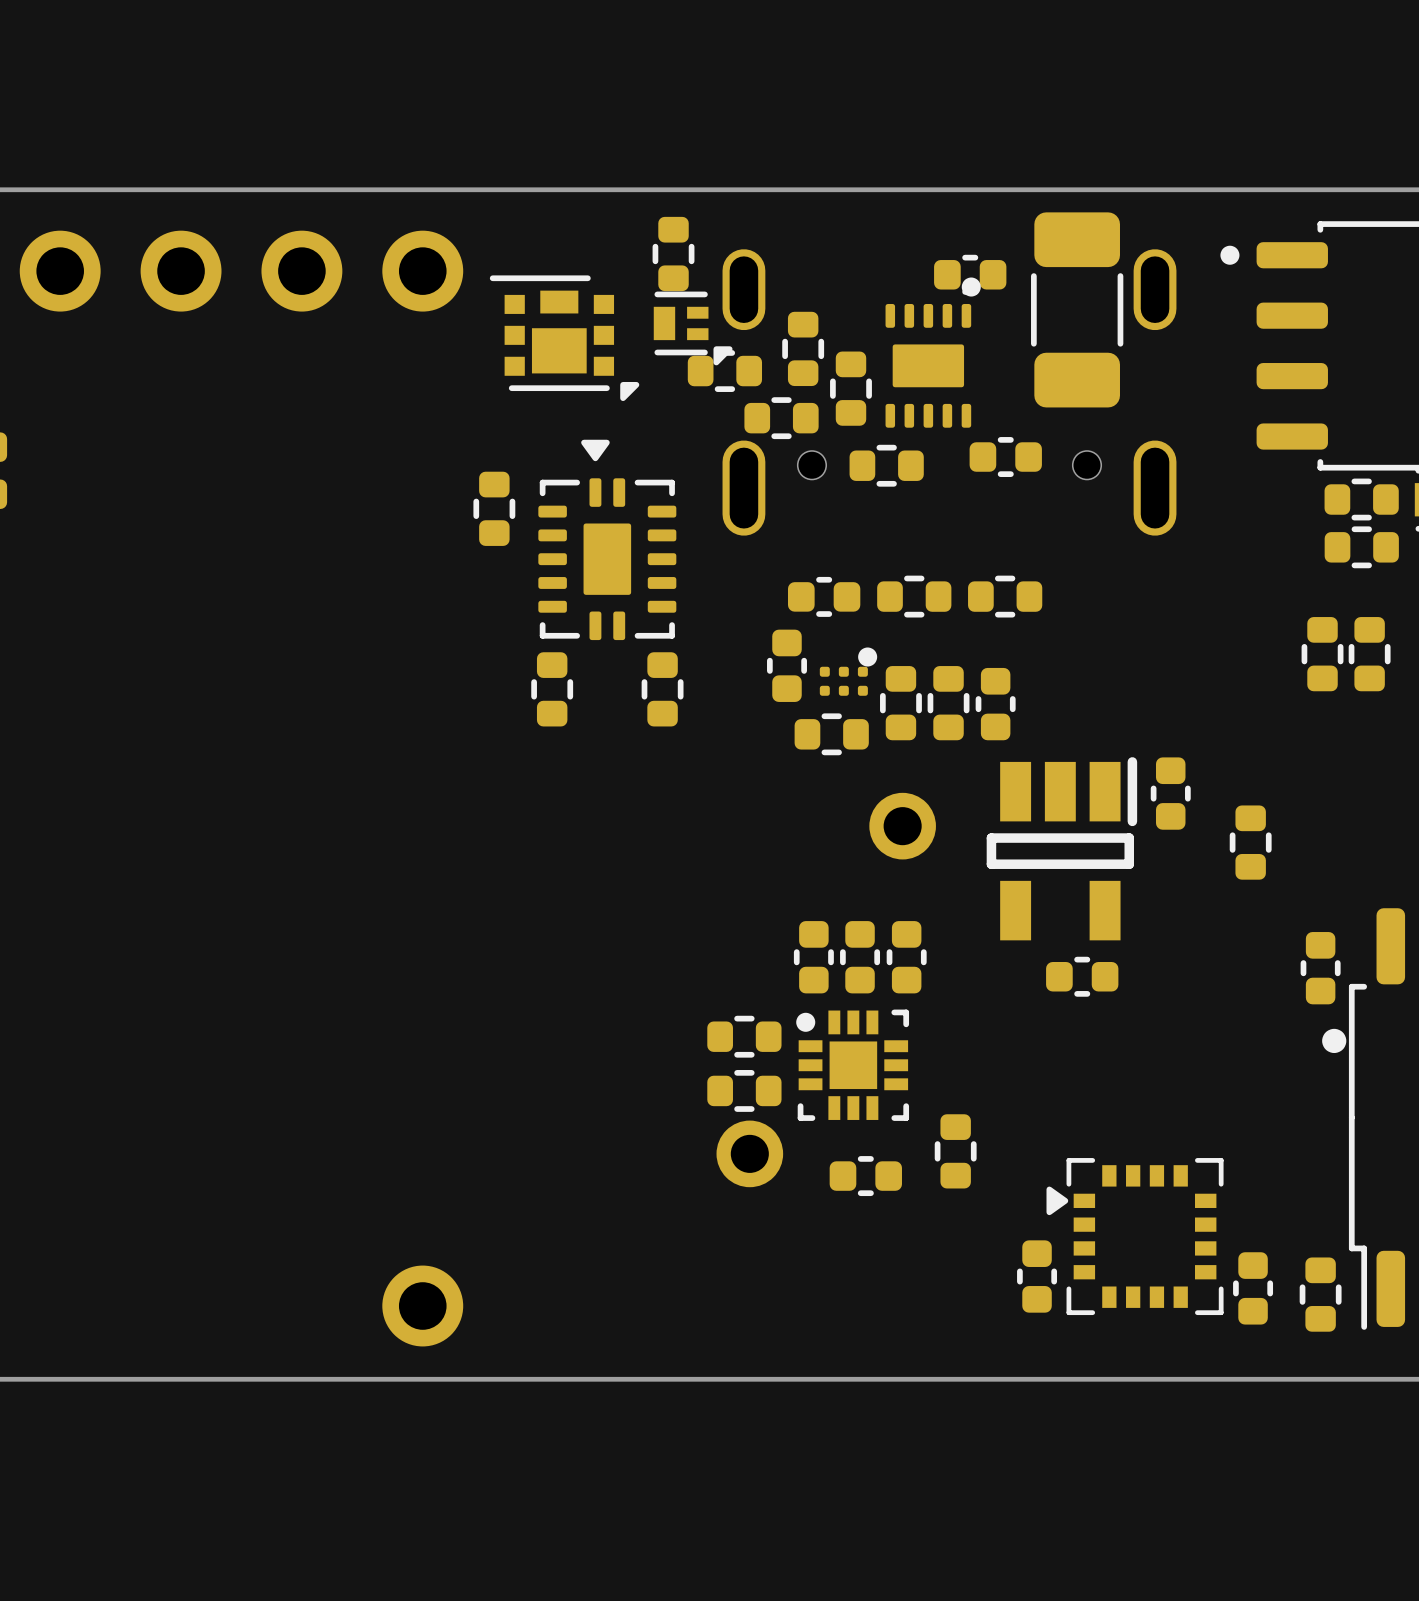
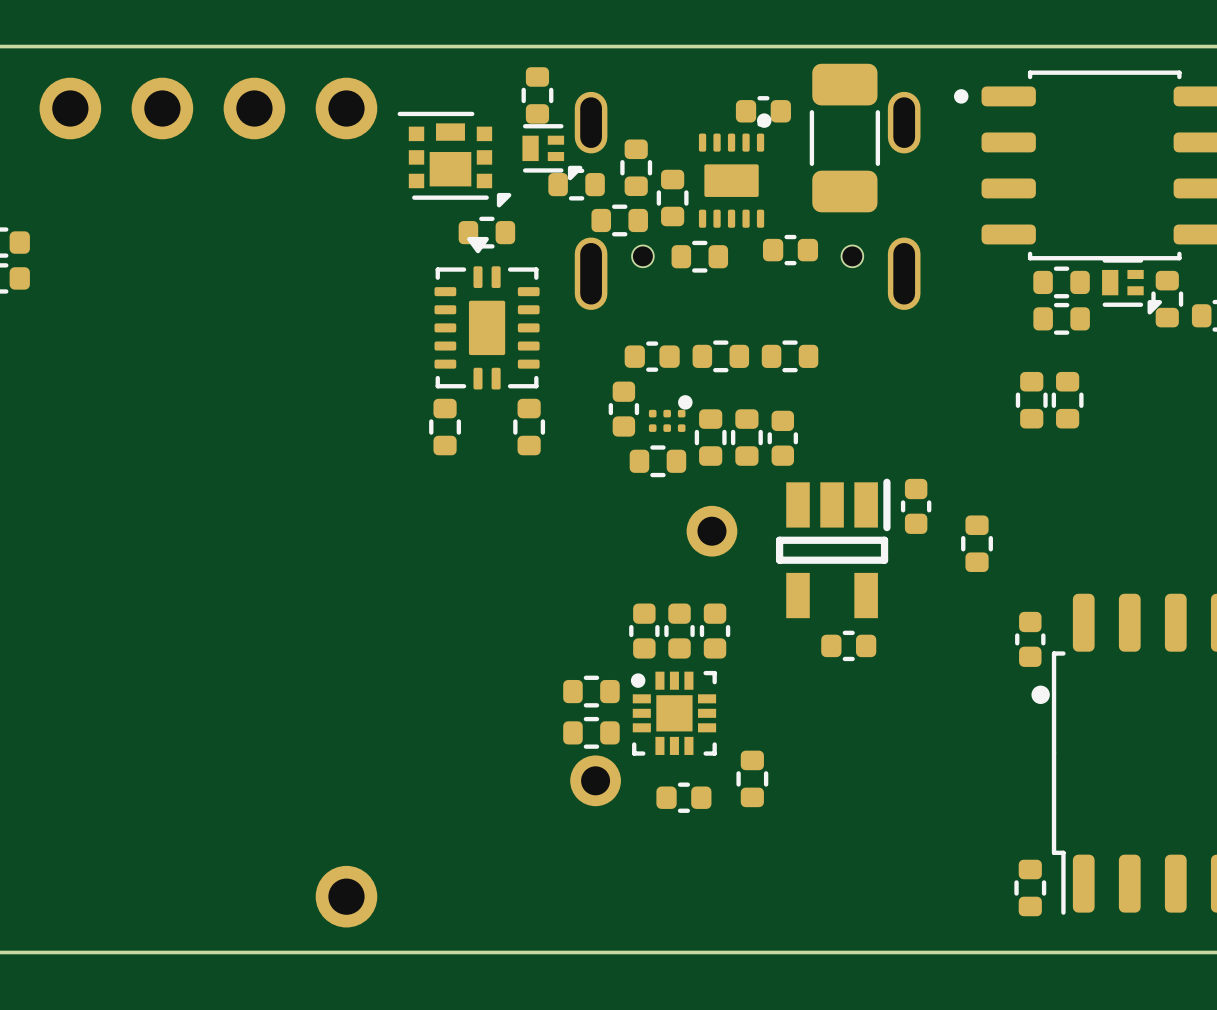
part rotation: 0° (494, 508) -> 90° clockwise (486, 232)
part position: (494, 508) -> (486, 232)
part: (1135, 1236) -> none
part: (1037, 1276) -> none
part: (1253, 1288) -> none

